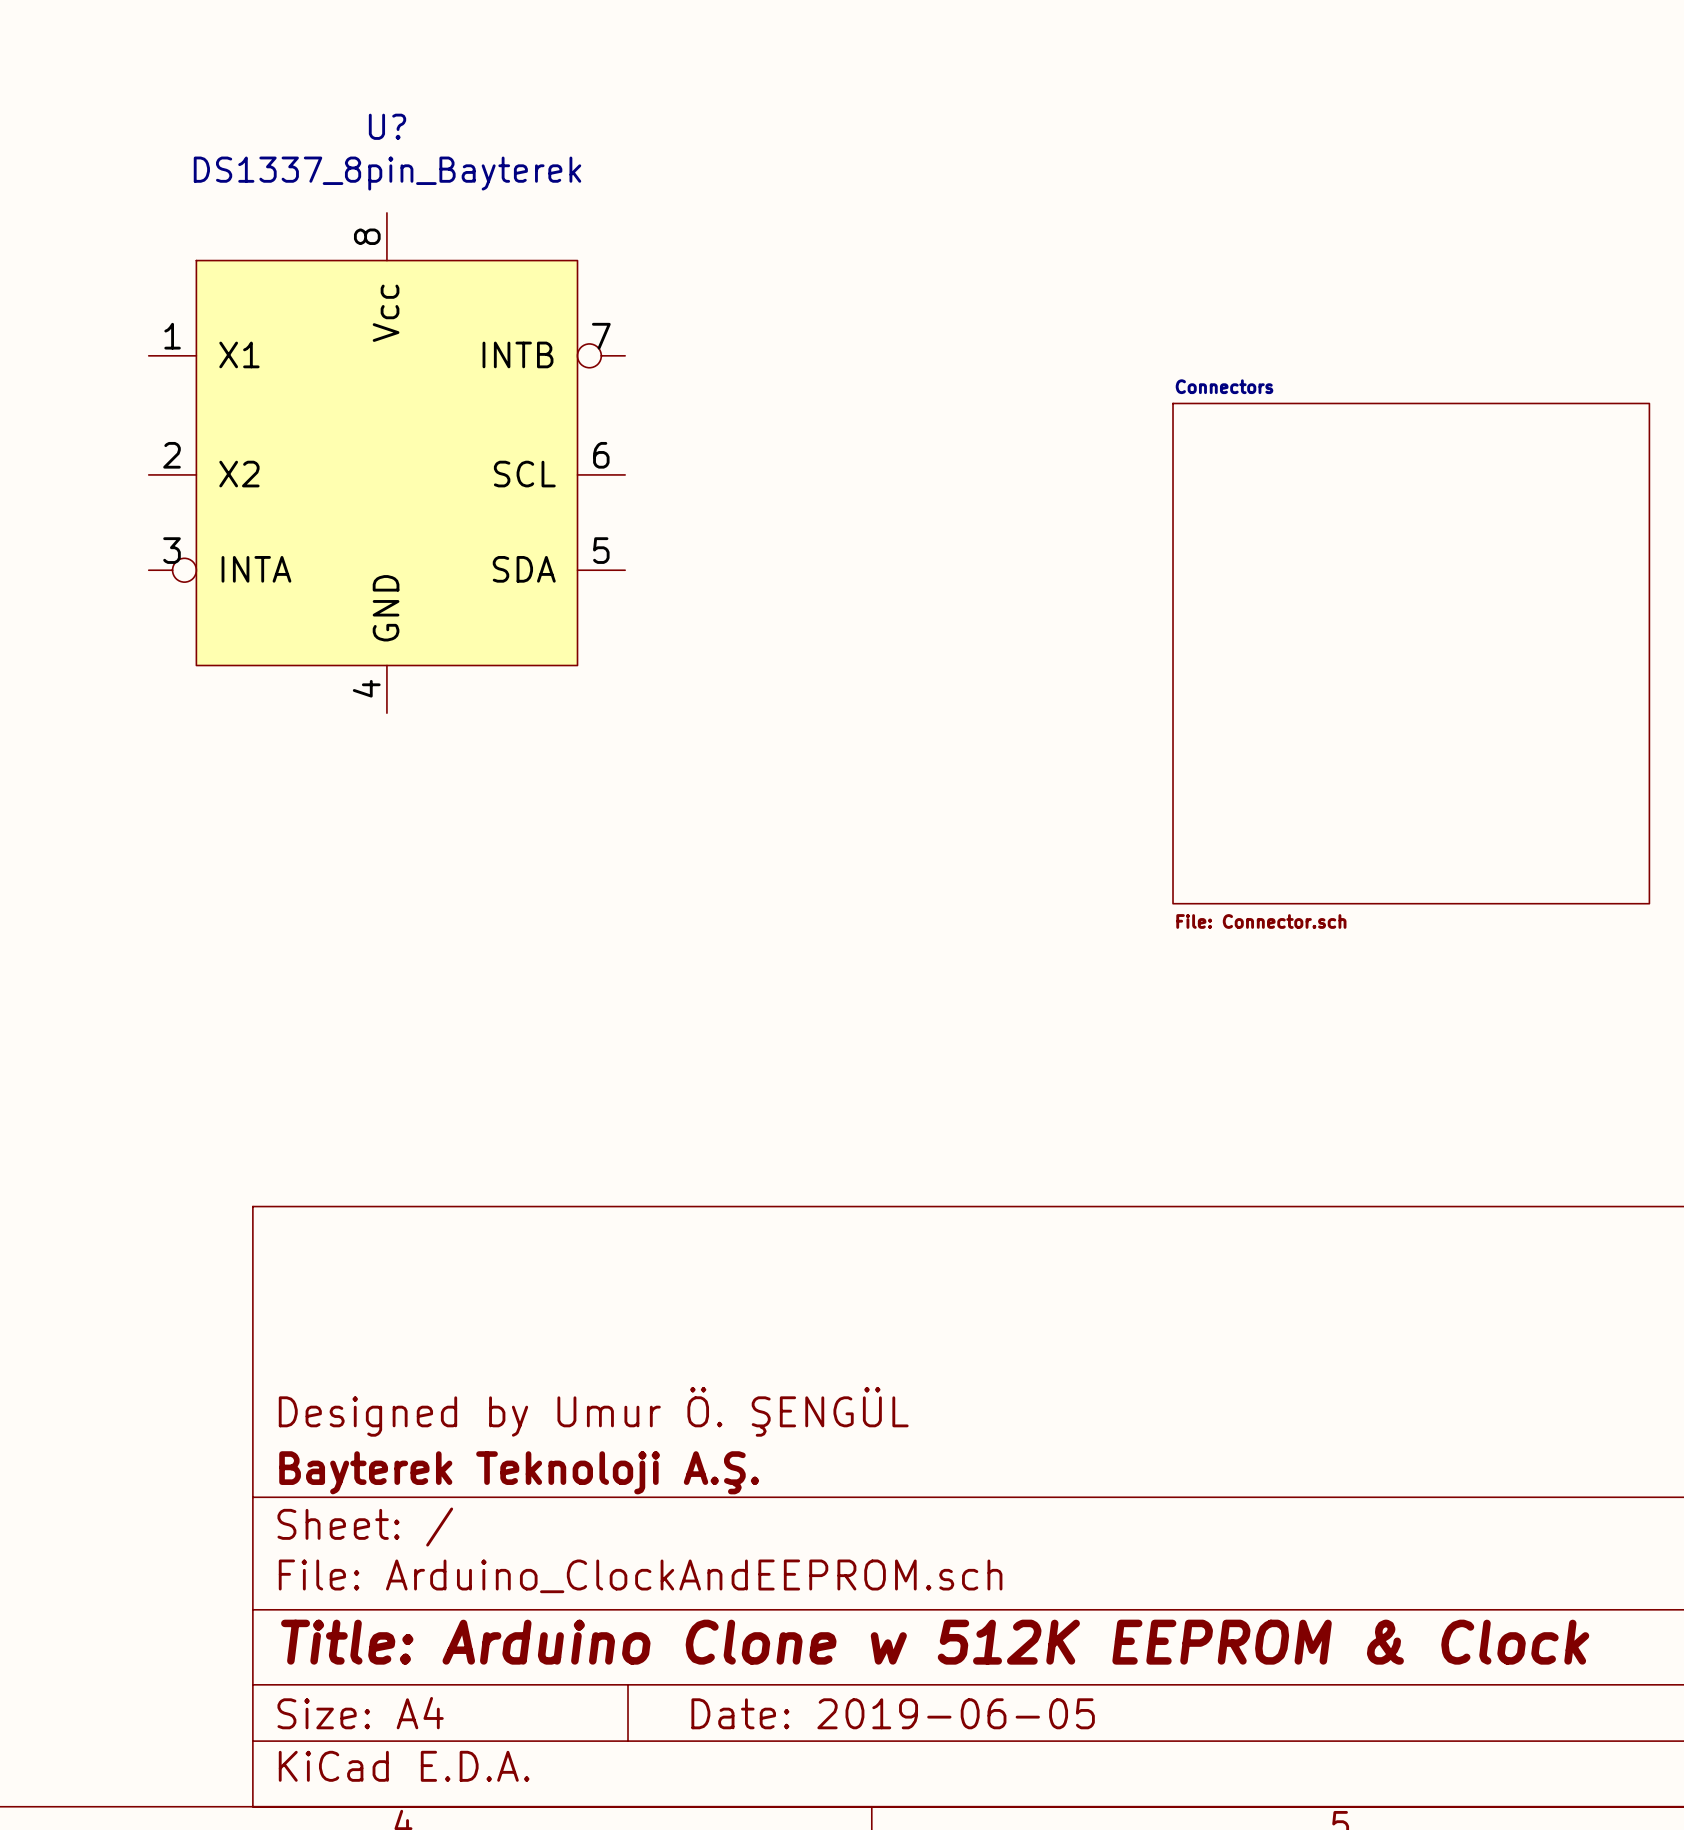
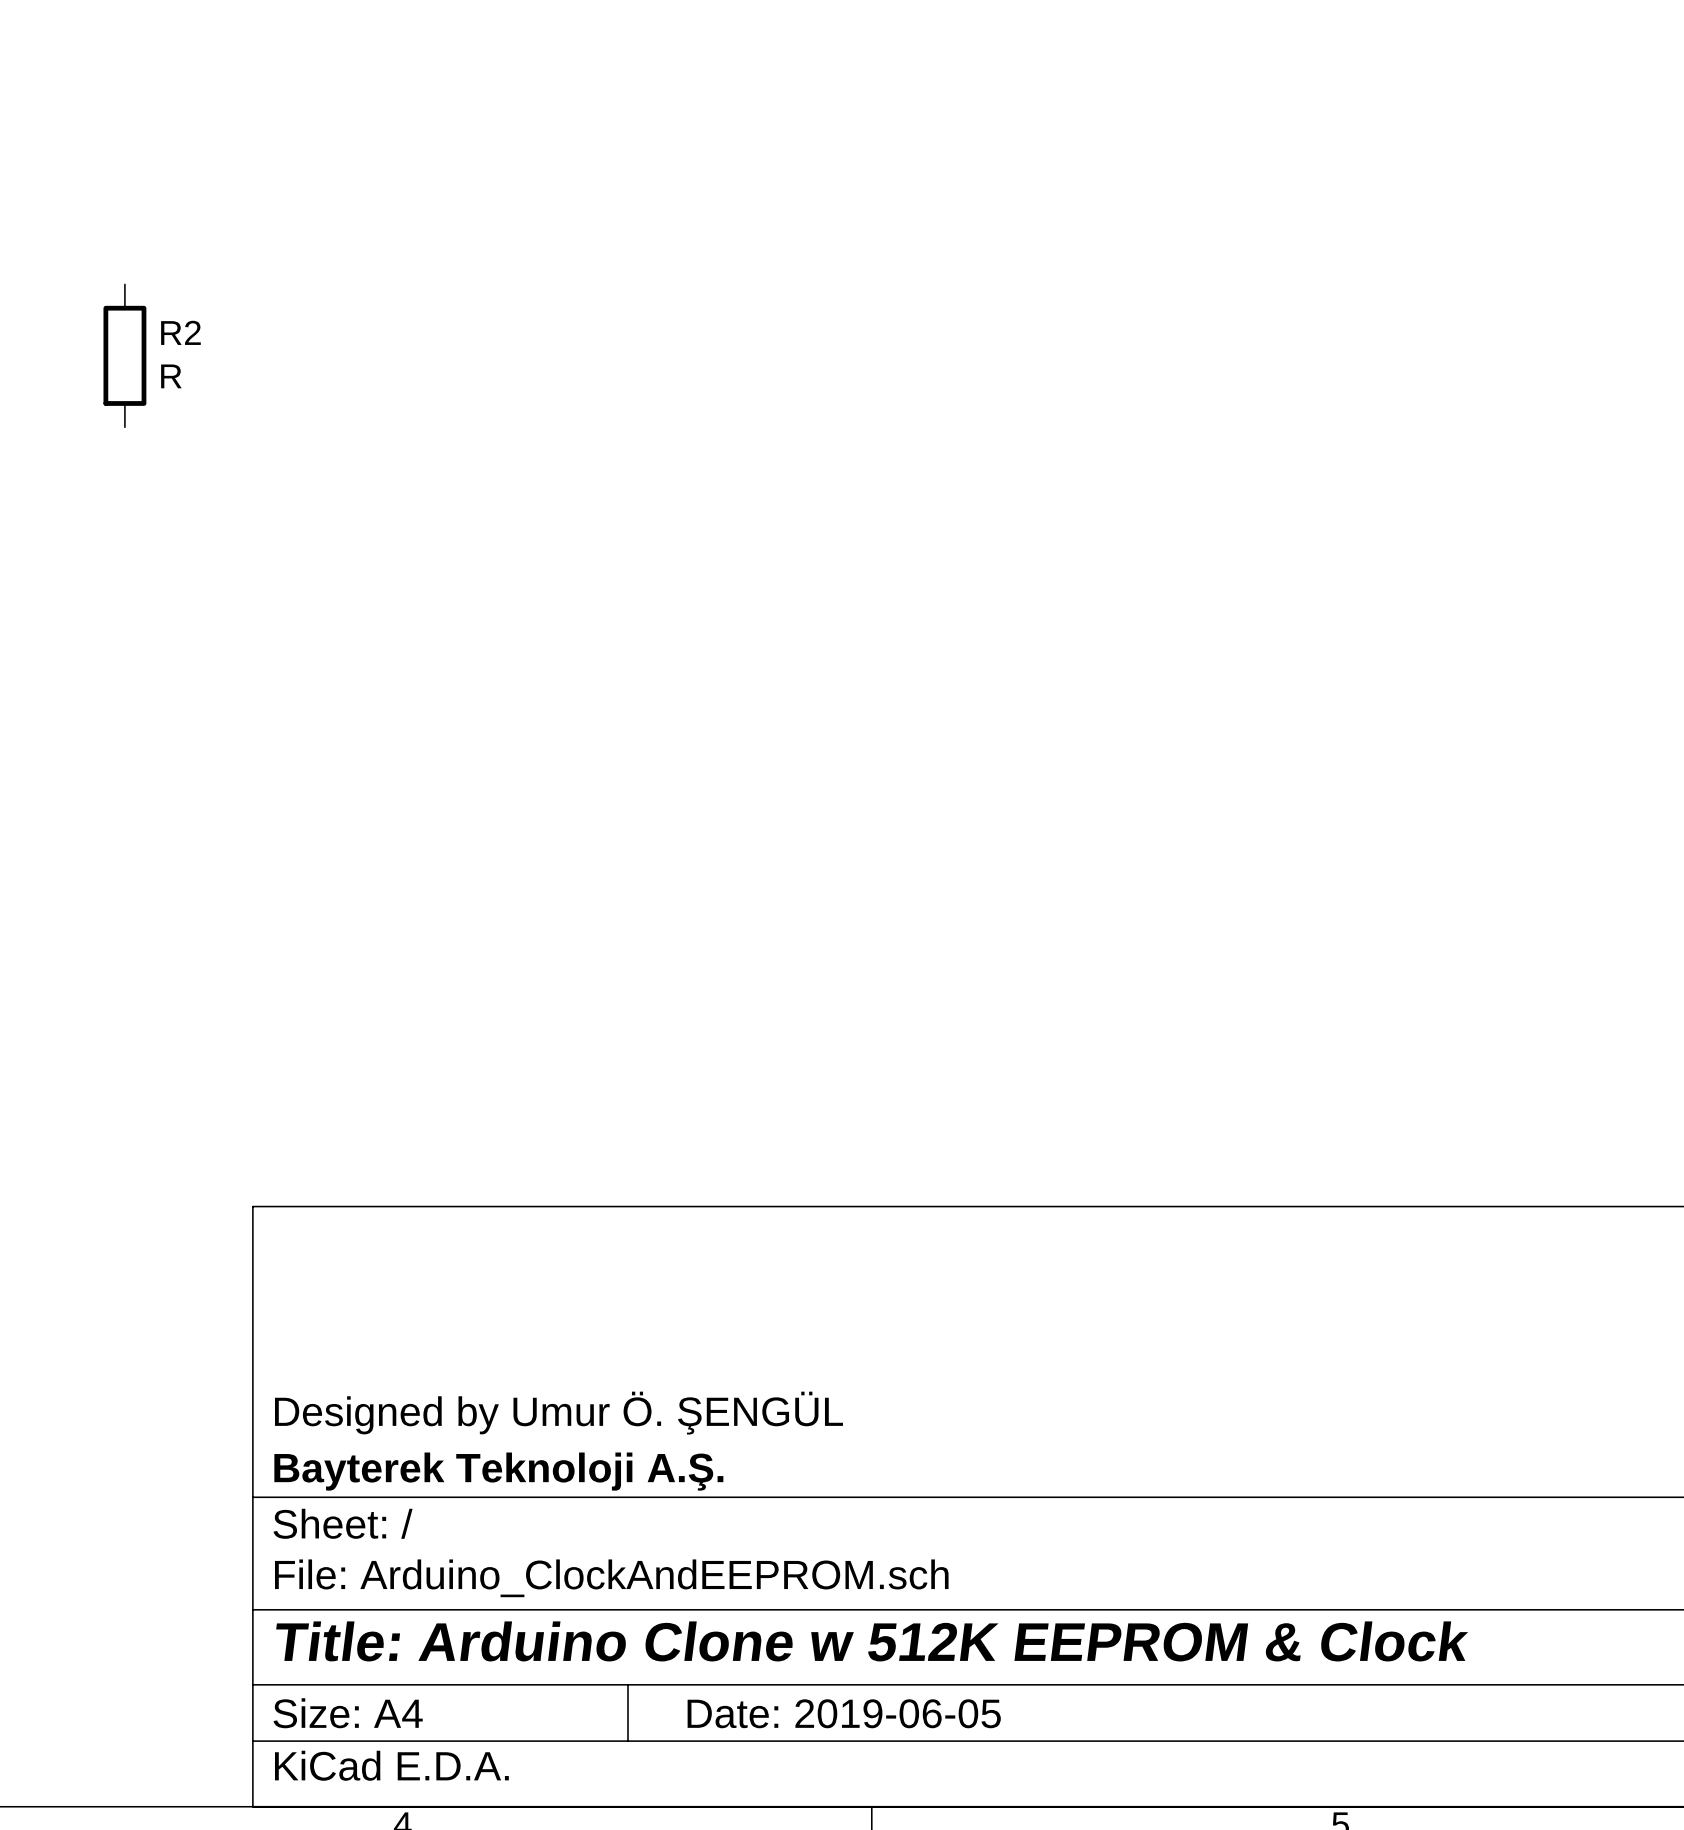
R2: none -> R (124, 355)
U?: DS1337_8pin_Bayterek (386, 463) -> none
sheet Connectors: File: Connector.sch (1411, 653) -> none

